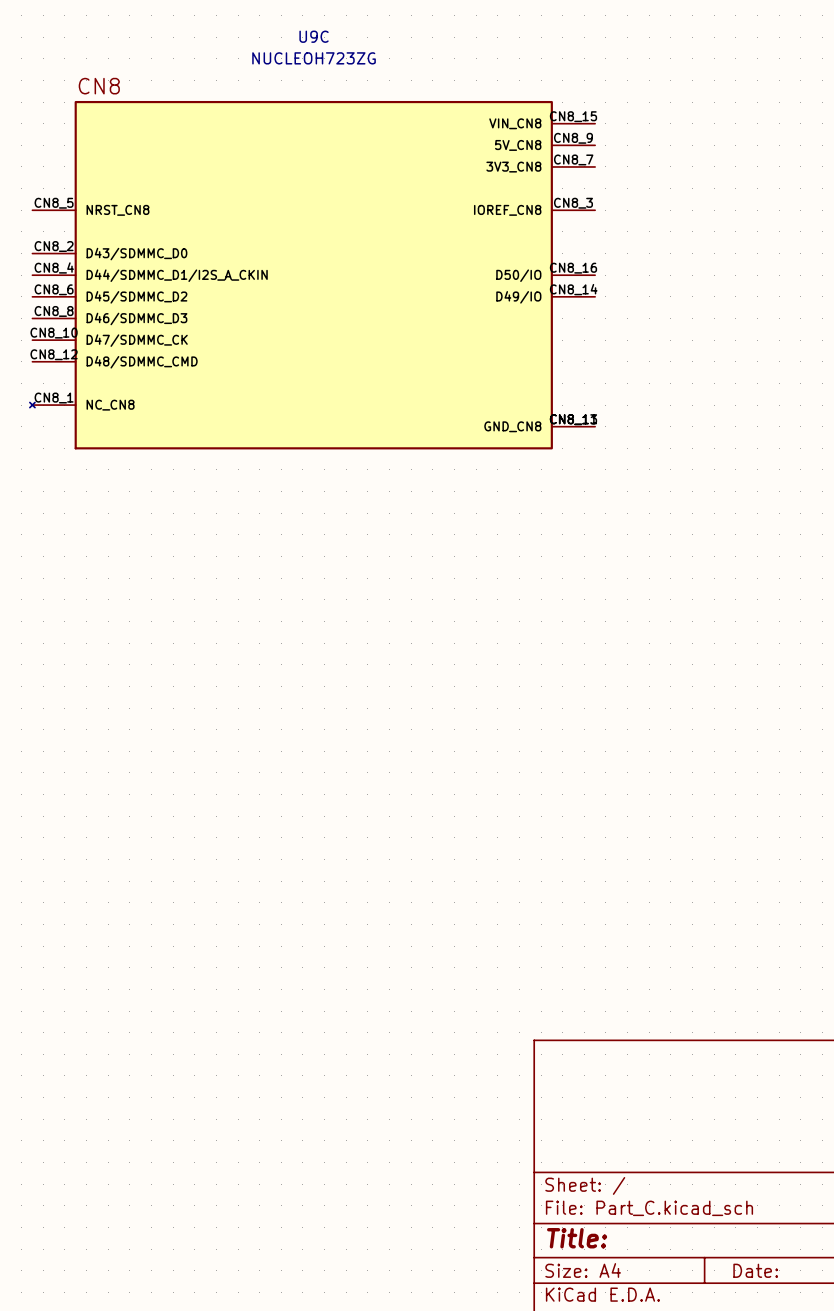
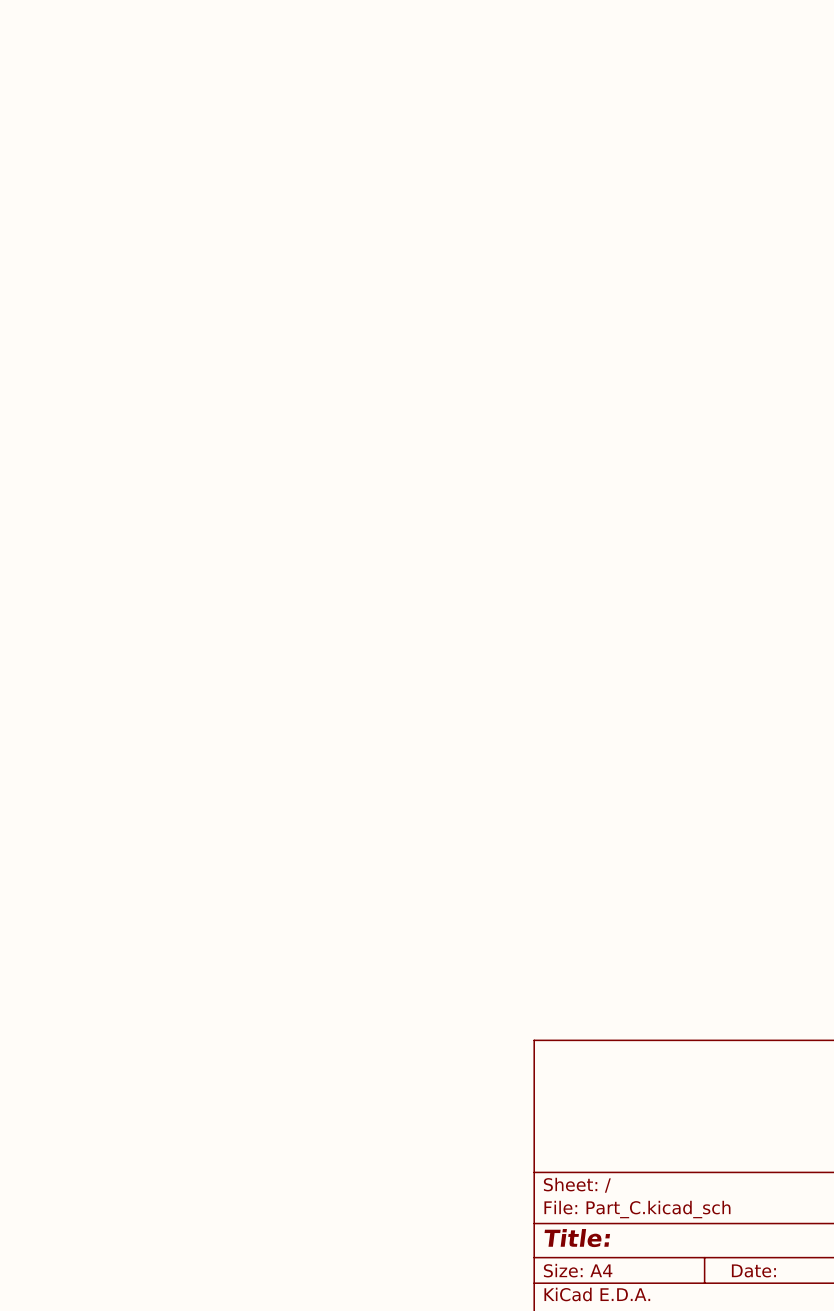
U9C: NUCLEOH723ZG (312, 275) -> none

